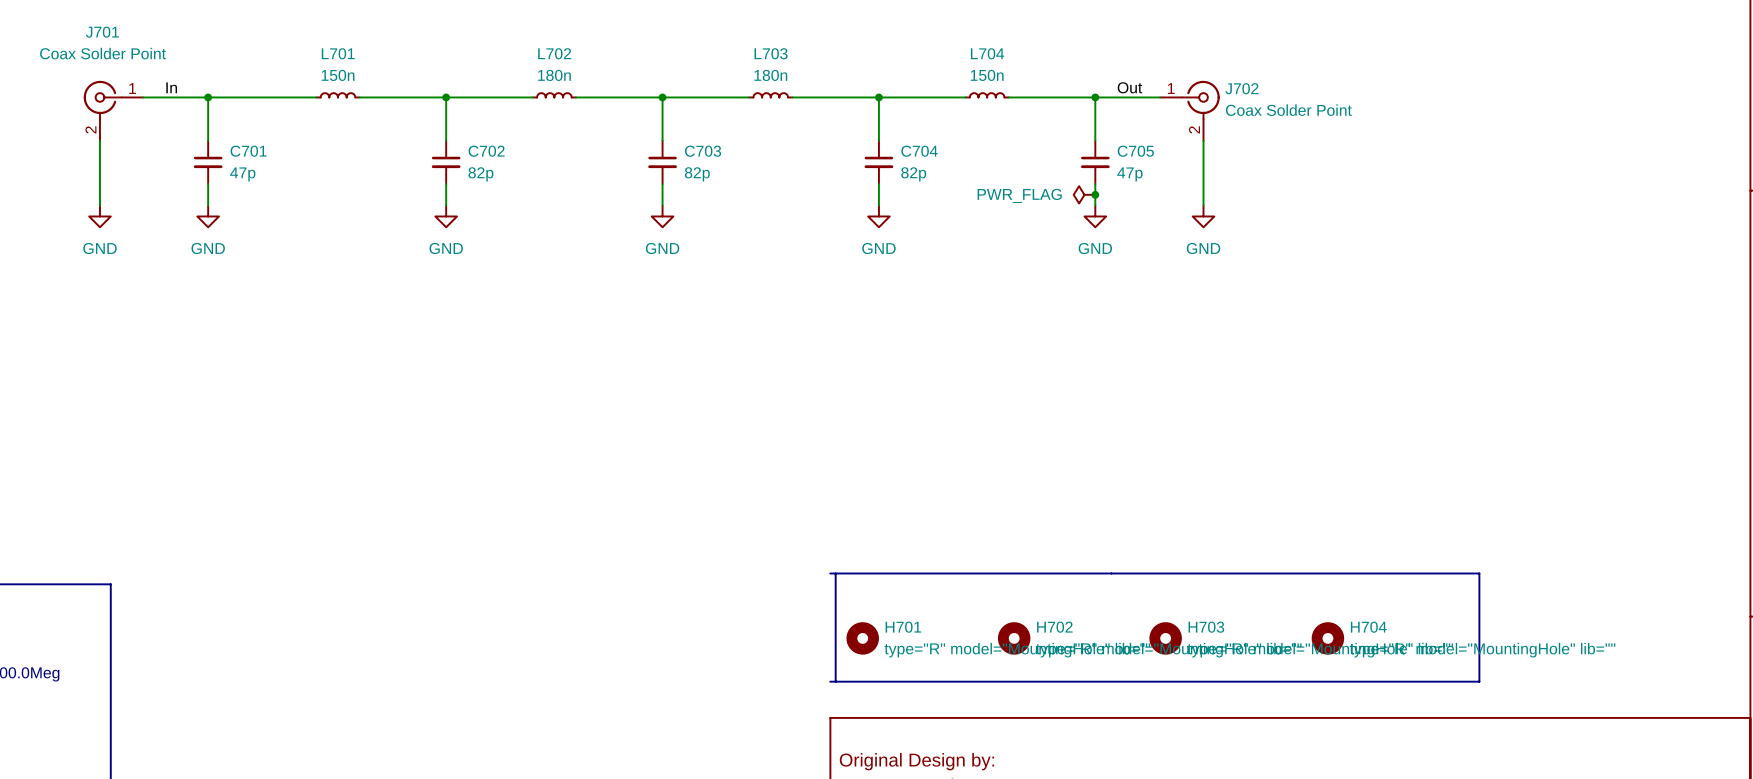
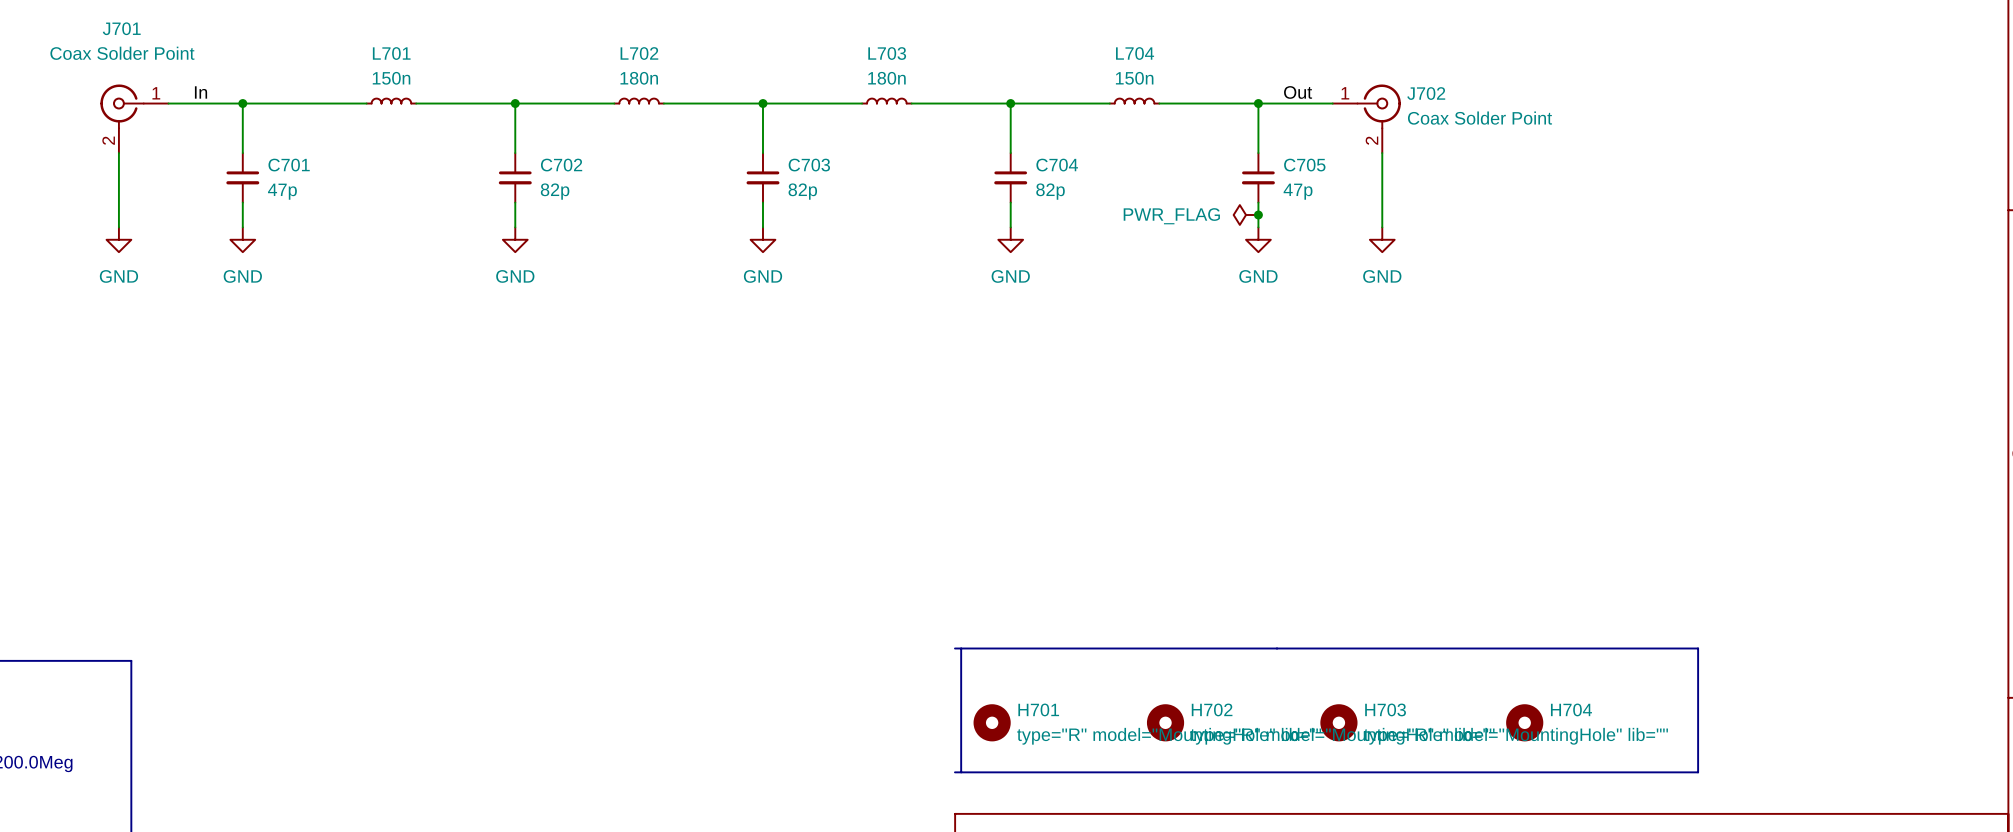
H704 value: type="R" model="MountingHole" lib="" (1482, 650) -> none

